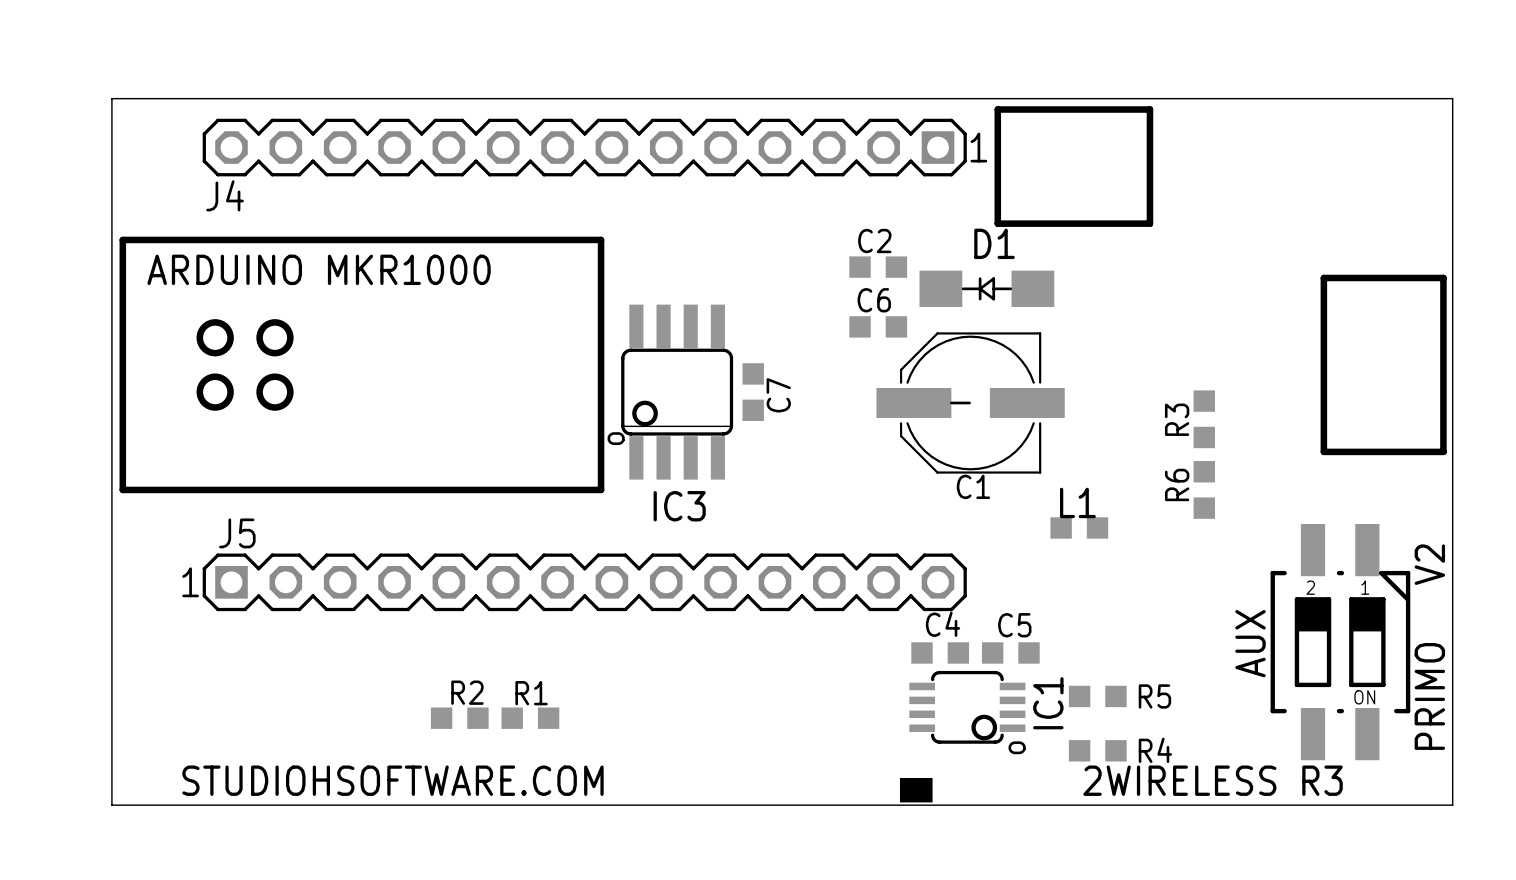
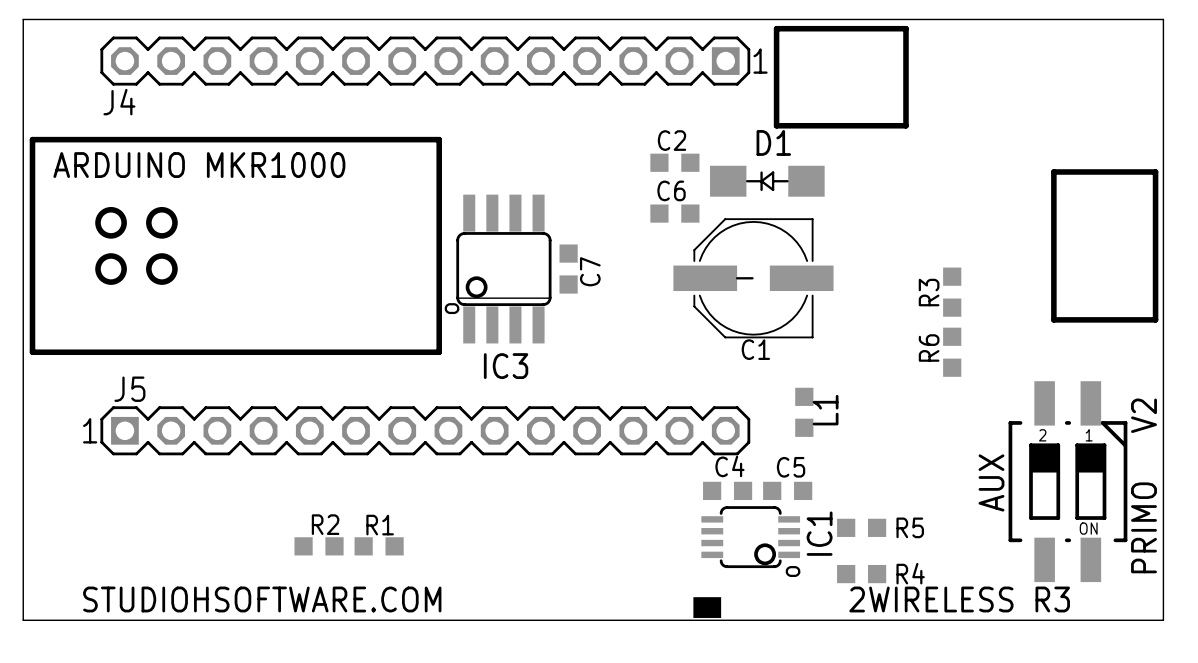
L1 rotation: 0° (1079, 527) -> 90° clockwise (804, 412)
L1 position: (1079, 527) -> (804, 412)

